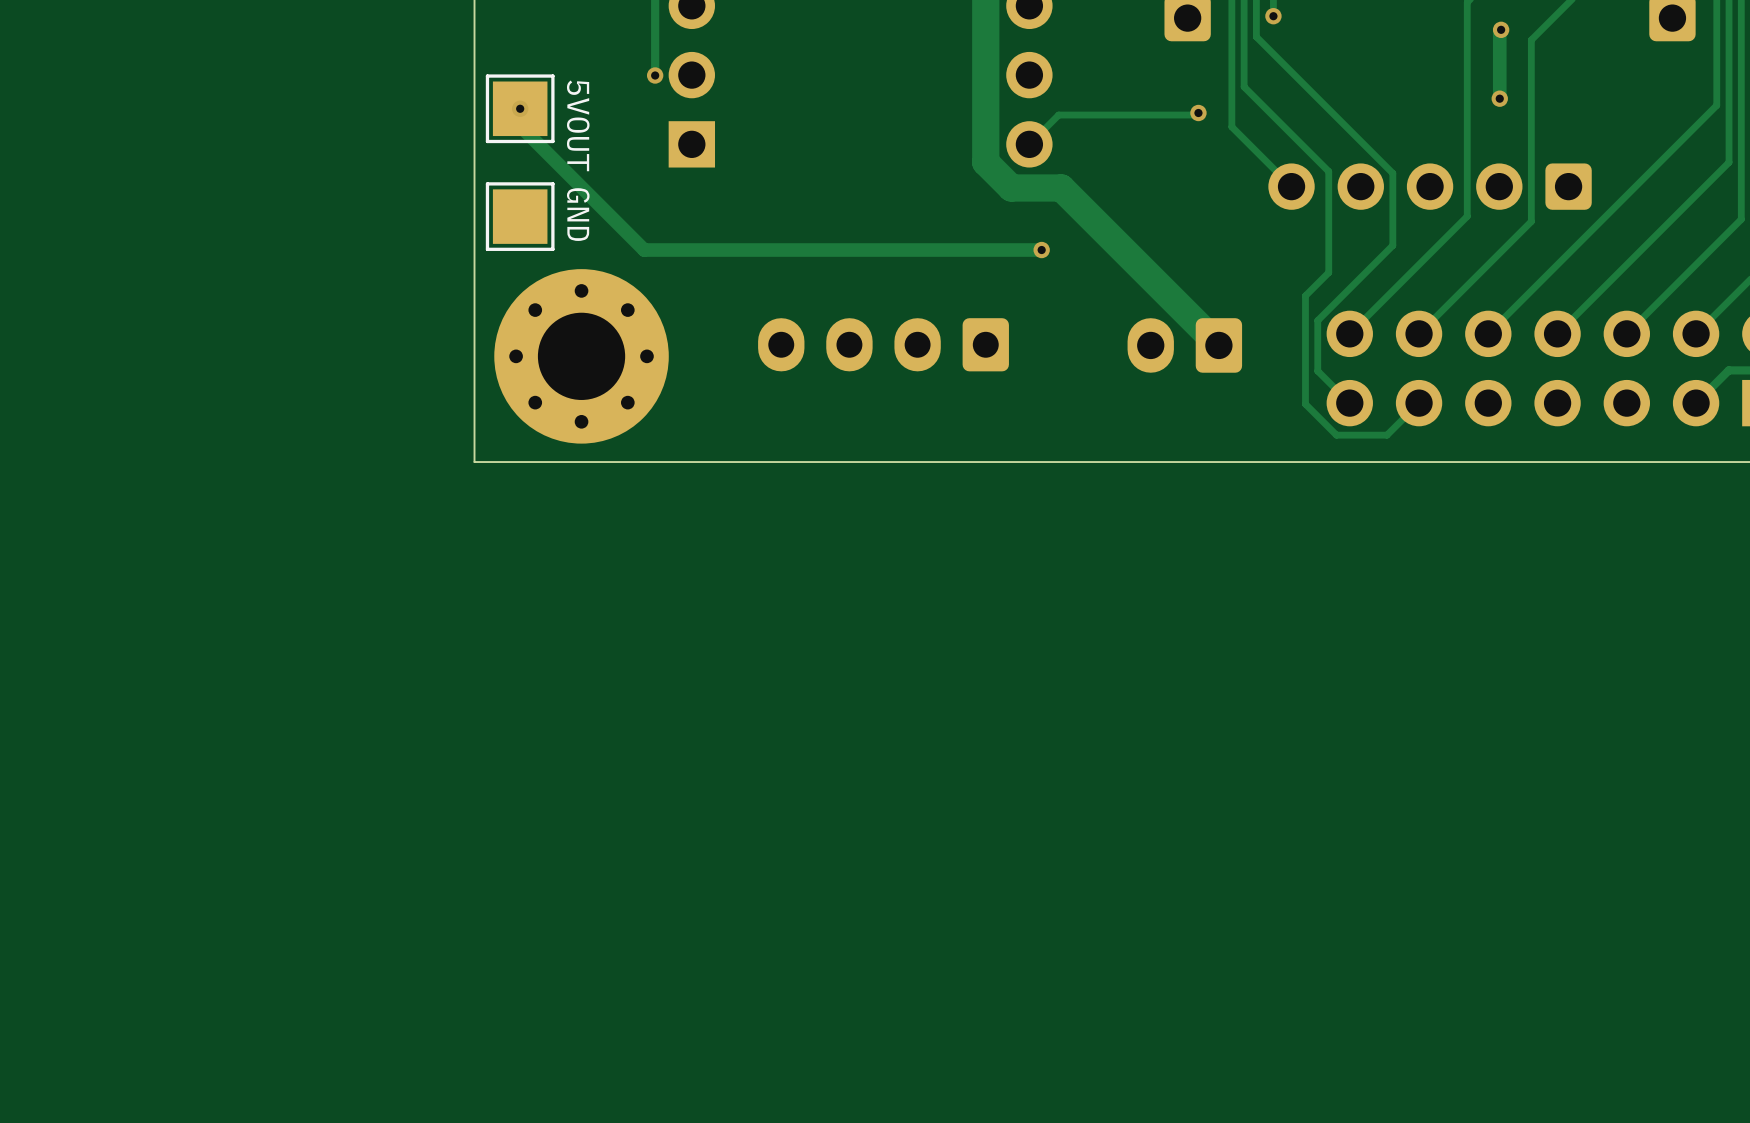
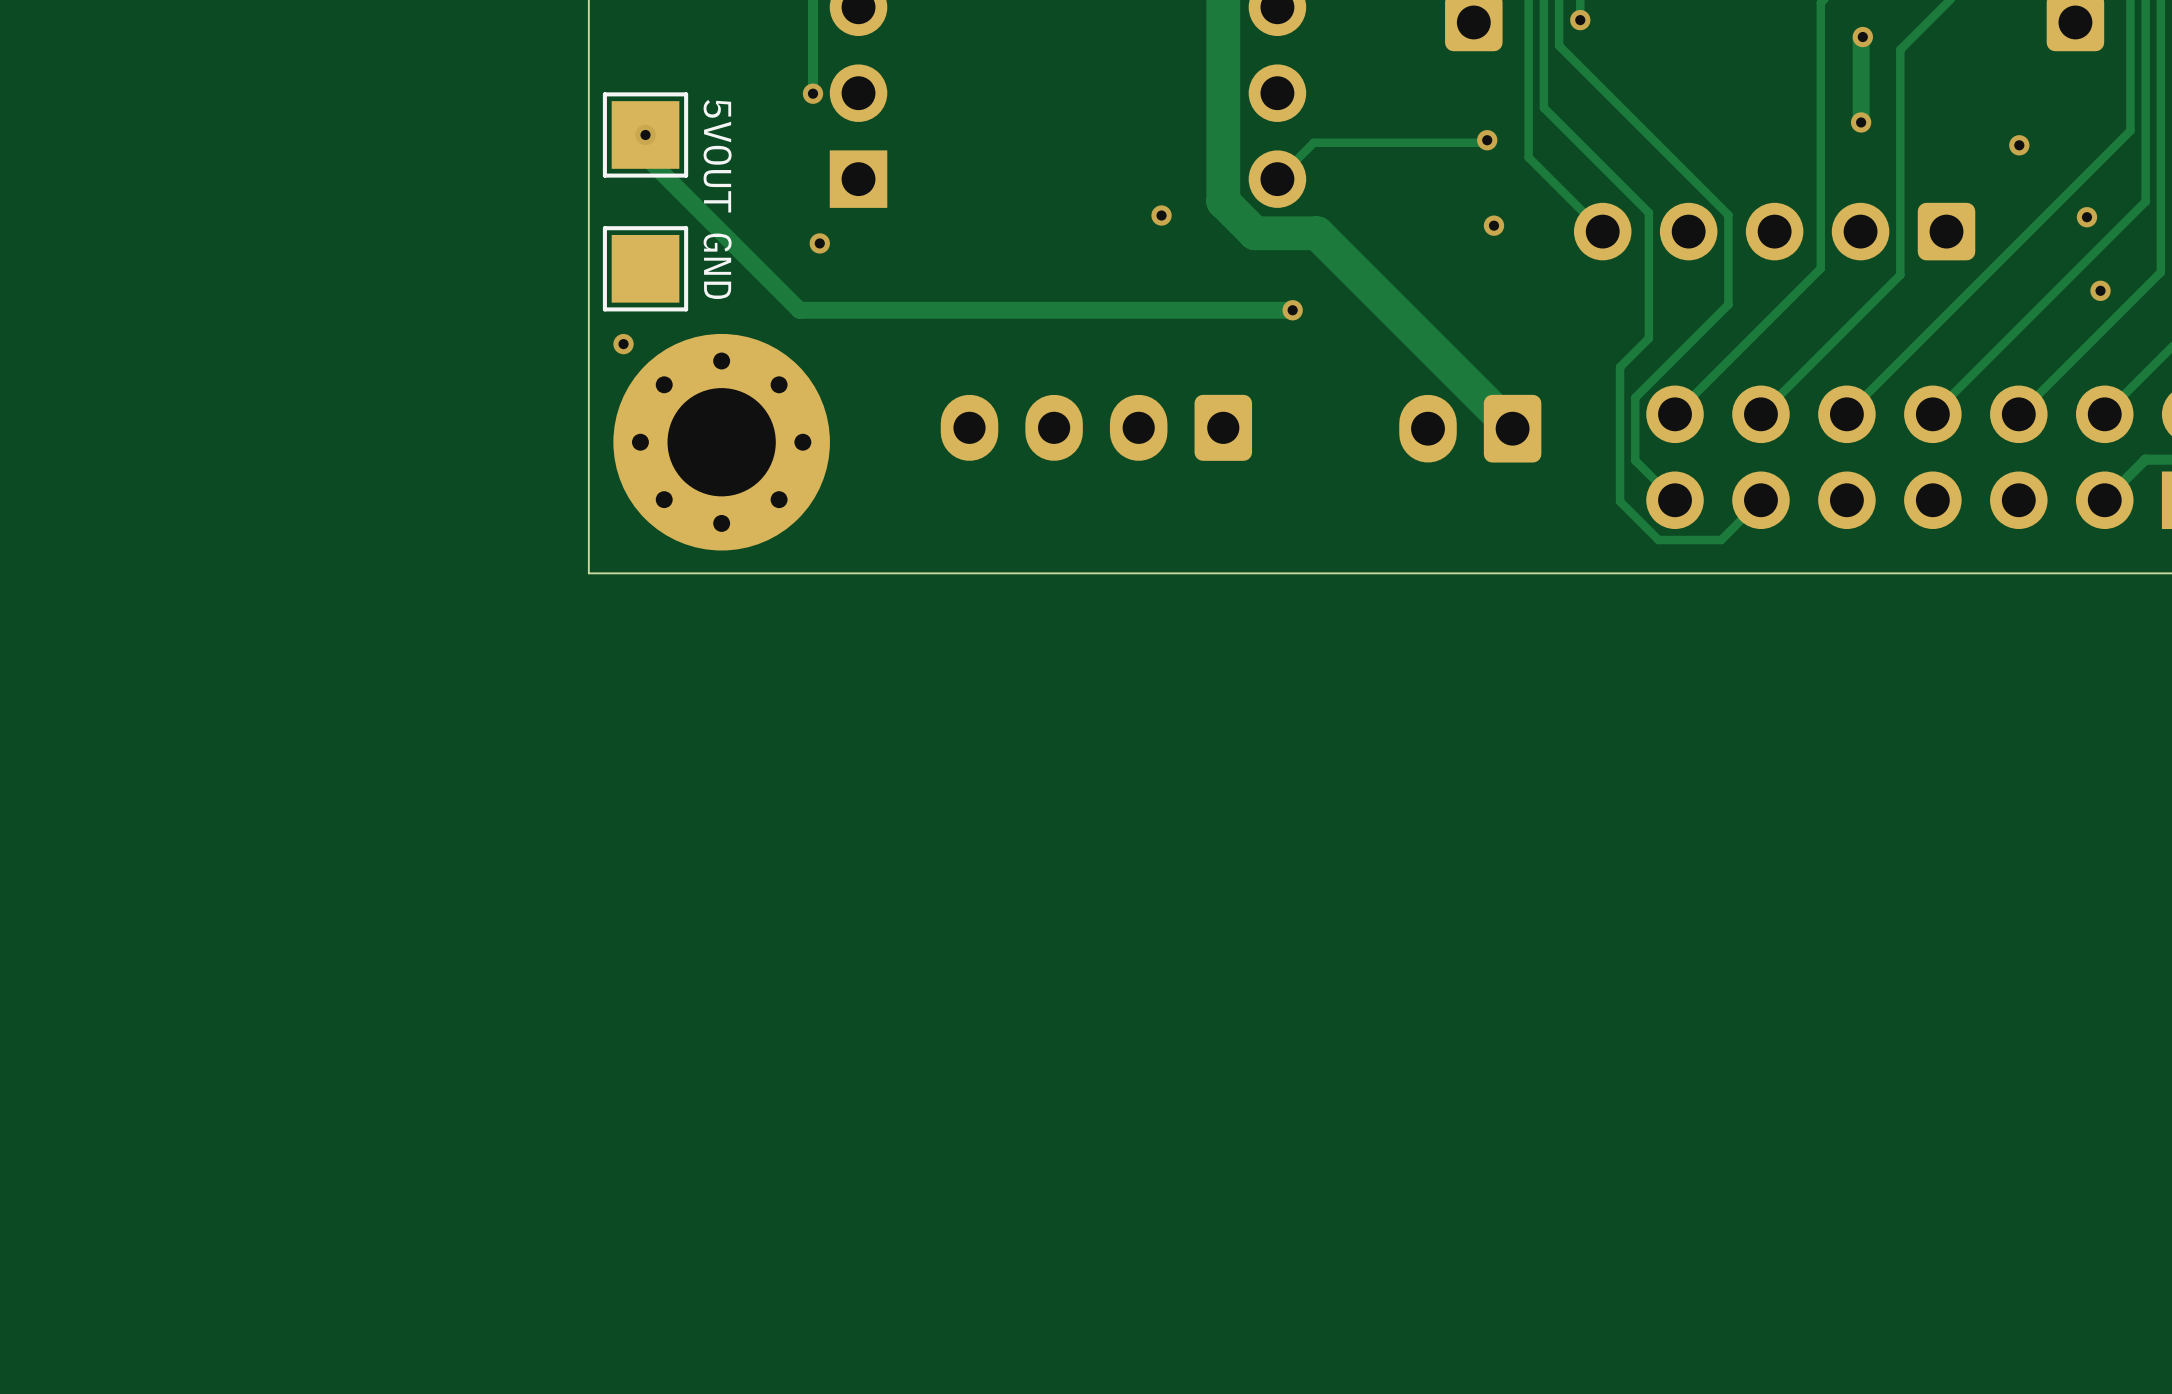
via: none -> (2019, 145)
via: none -> (1161, 215)
via: none -> (2086, 217)
via: none -> (1493, 225)
via: none -> (819, 243)
via: none -> (2100, 290)
via: none -> (623, 344)

